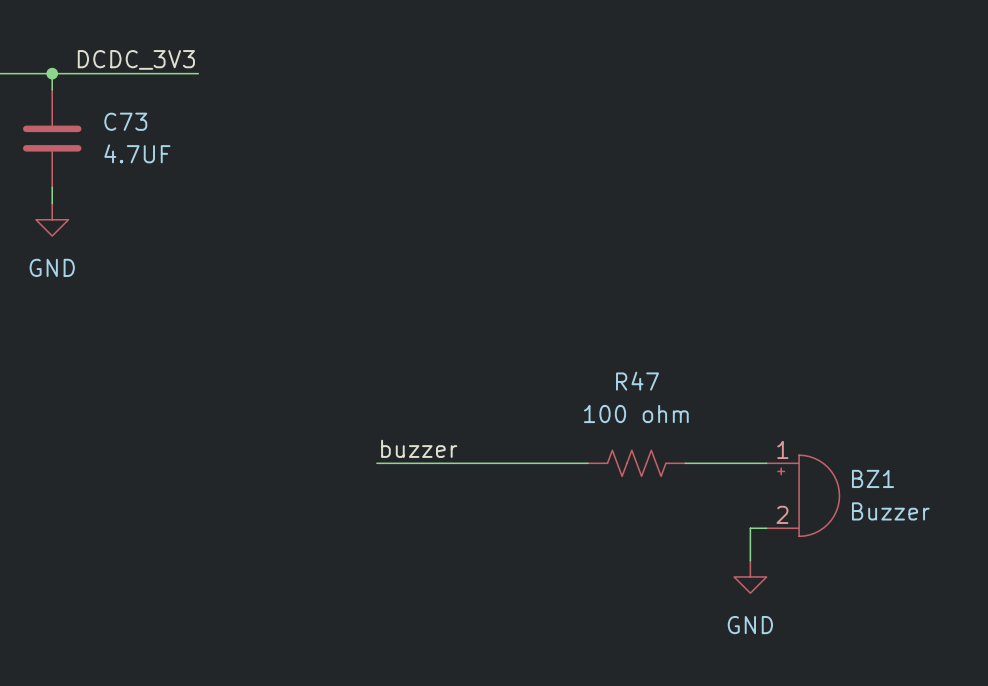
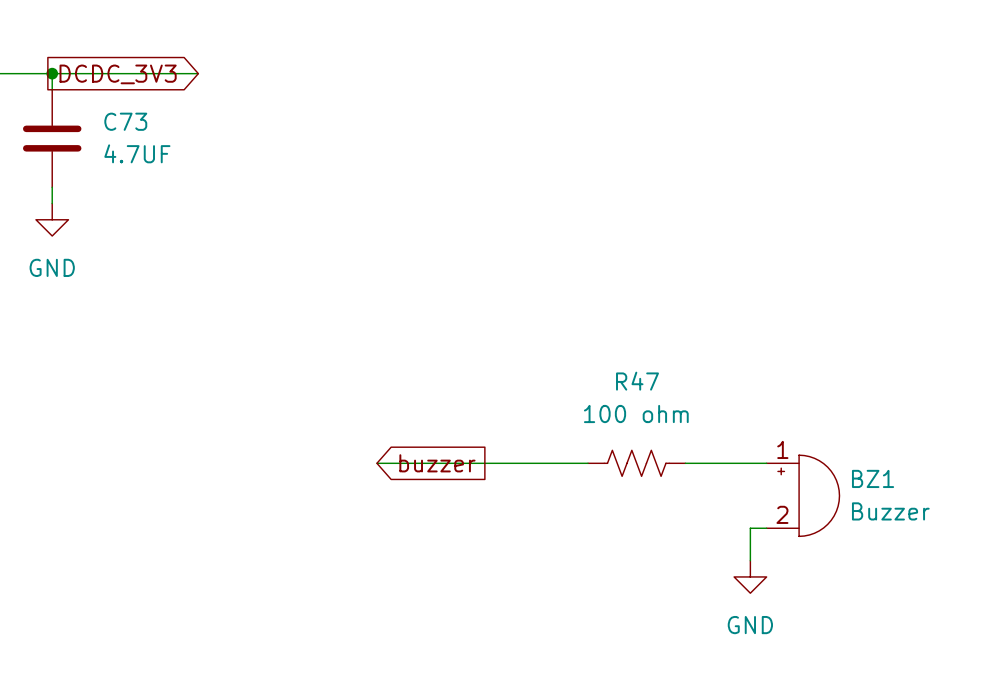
label: DCDC_3V3 (136, 59) -> none
global label: none -> DCDC_3V3 (118, 74)
label: buzzer (419, 448) -> none
global label: none -> buzzer (437, 463)

